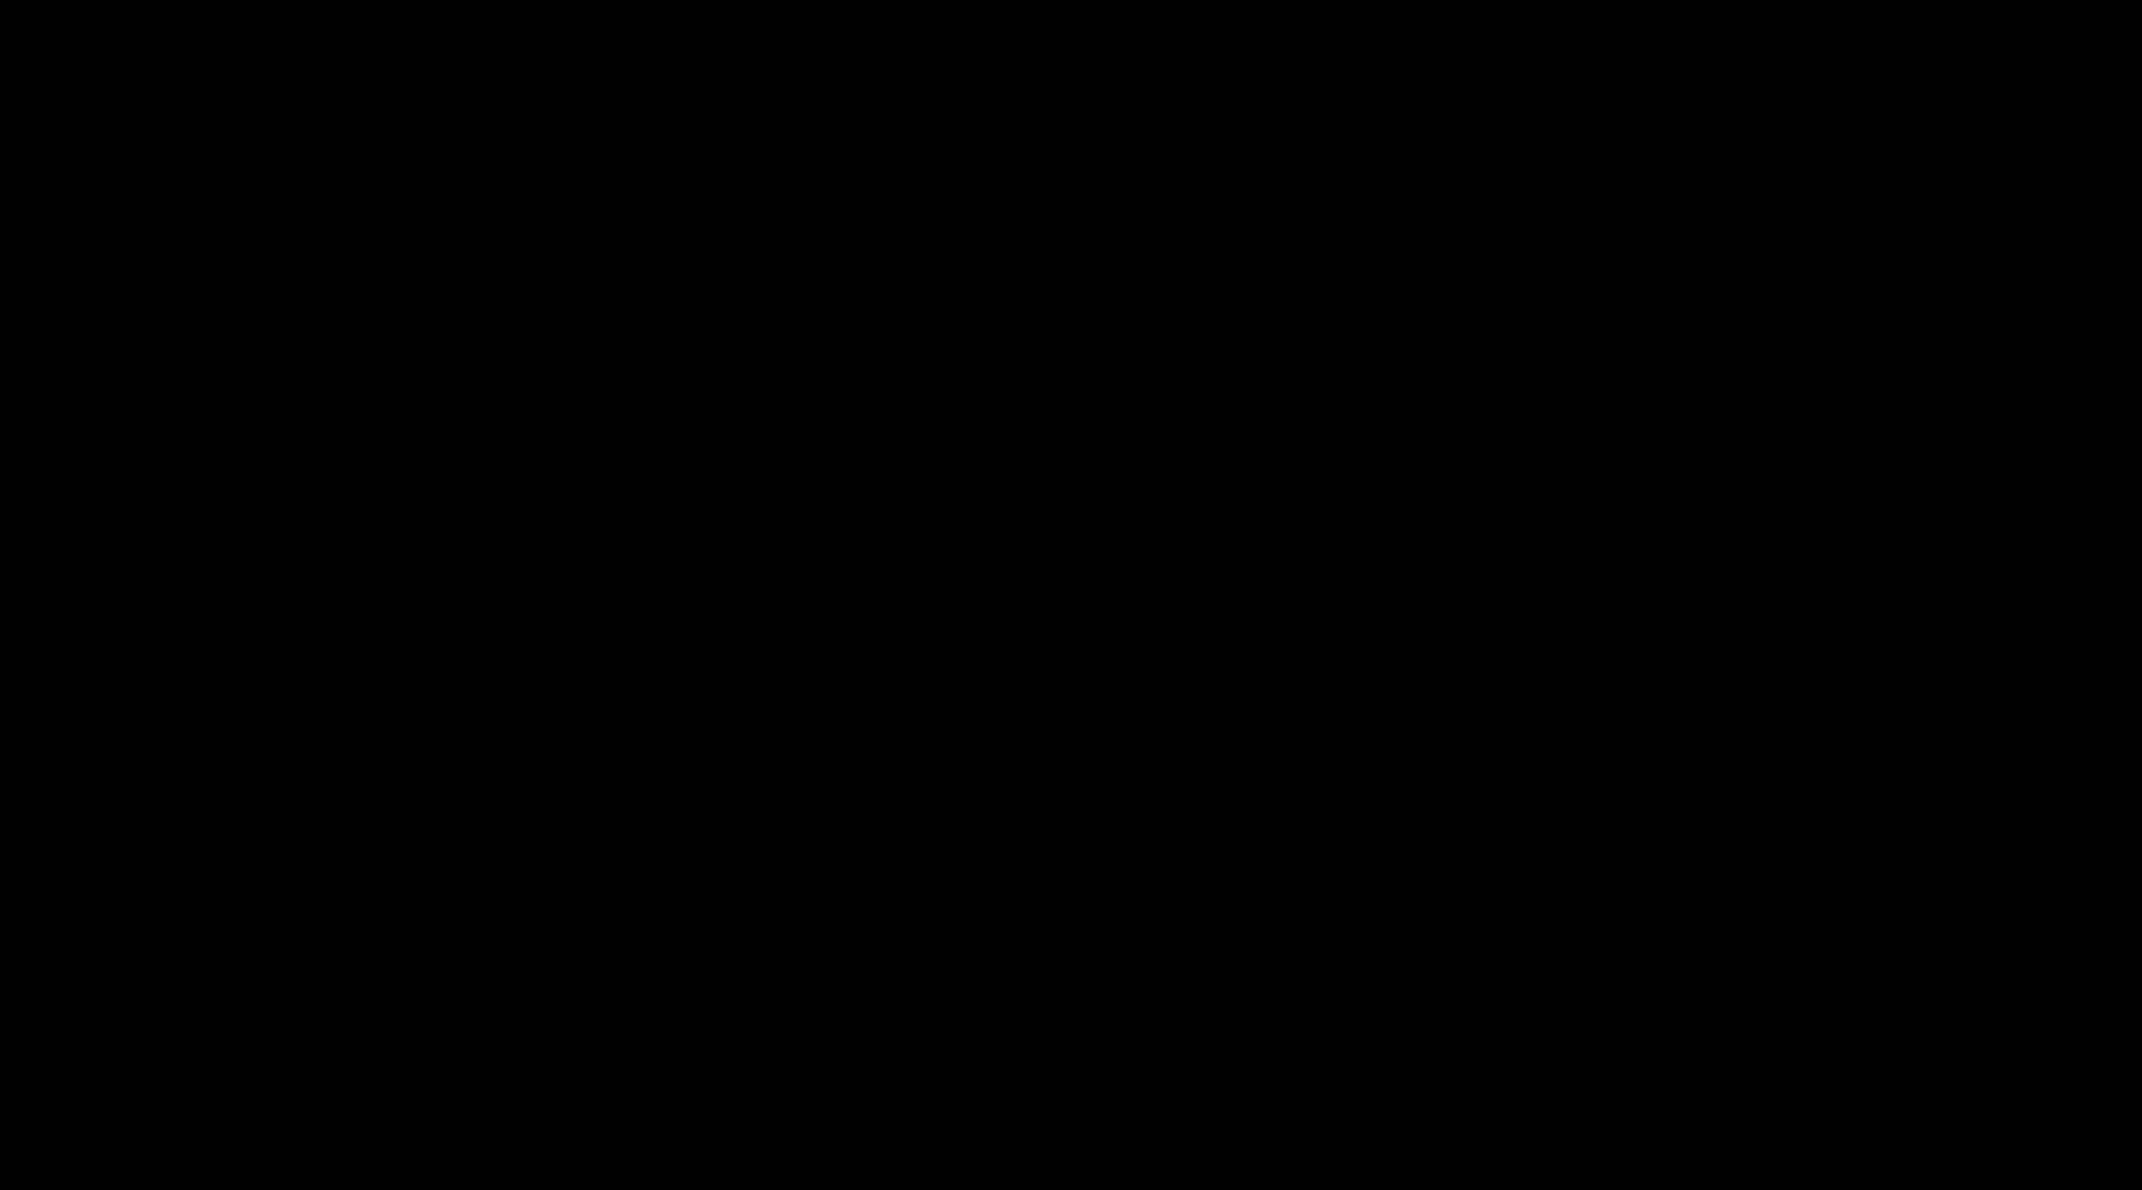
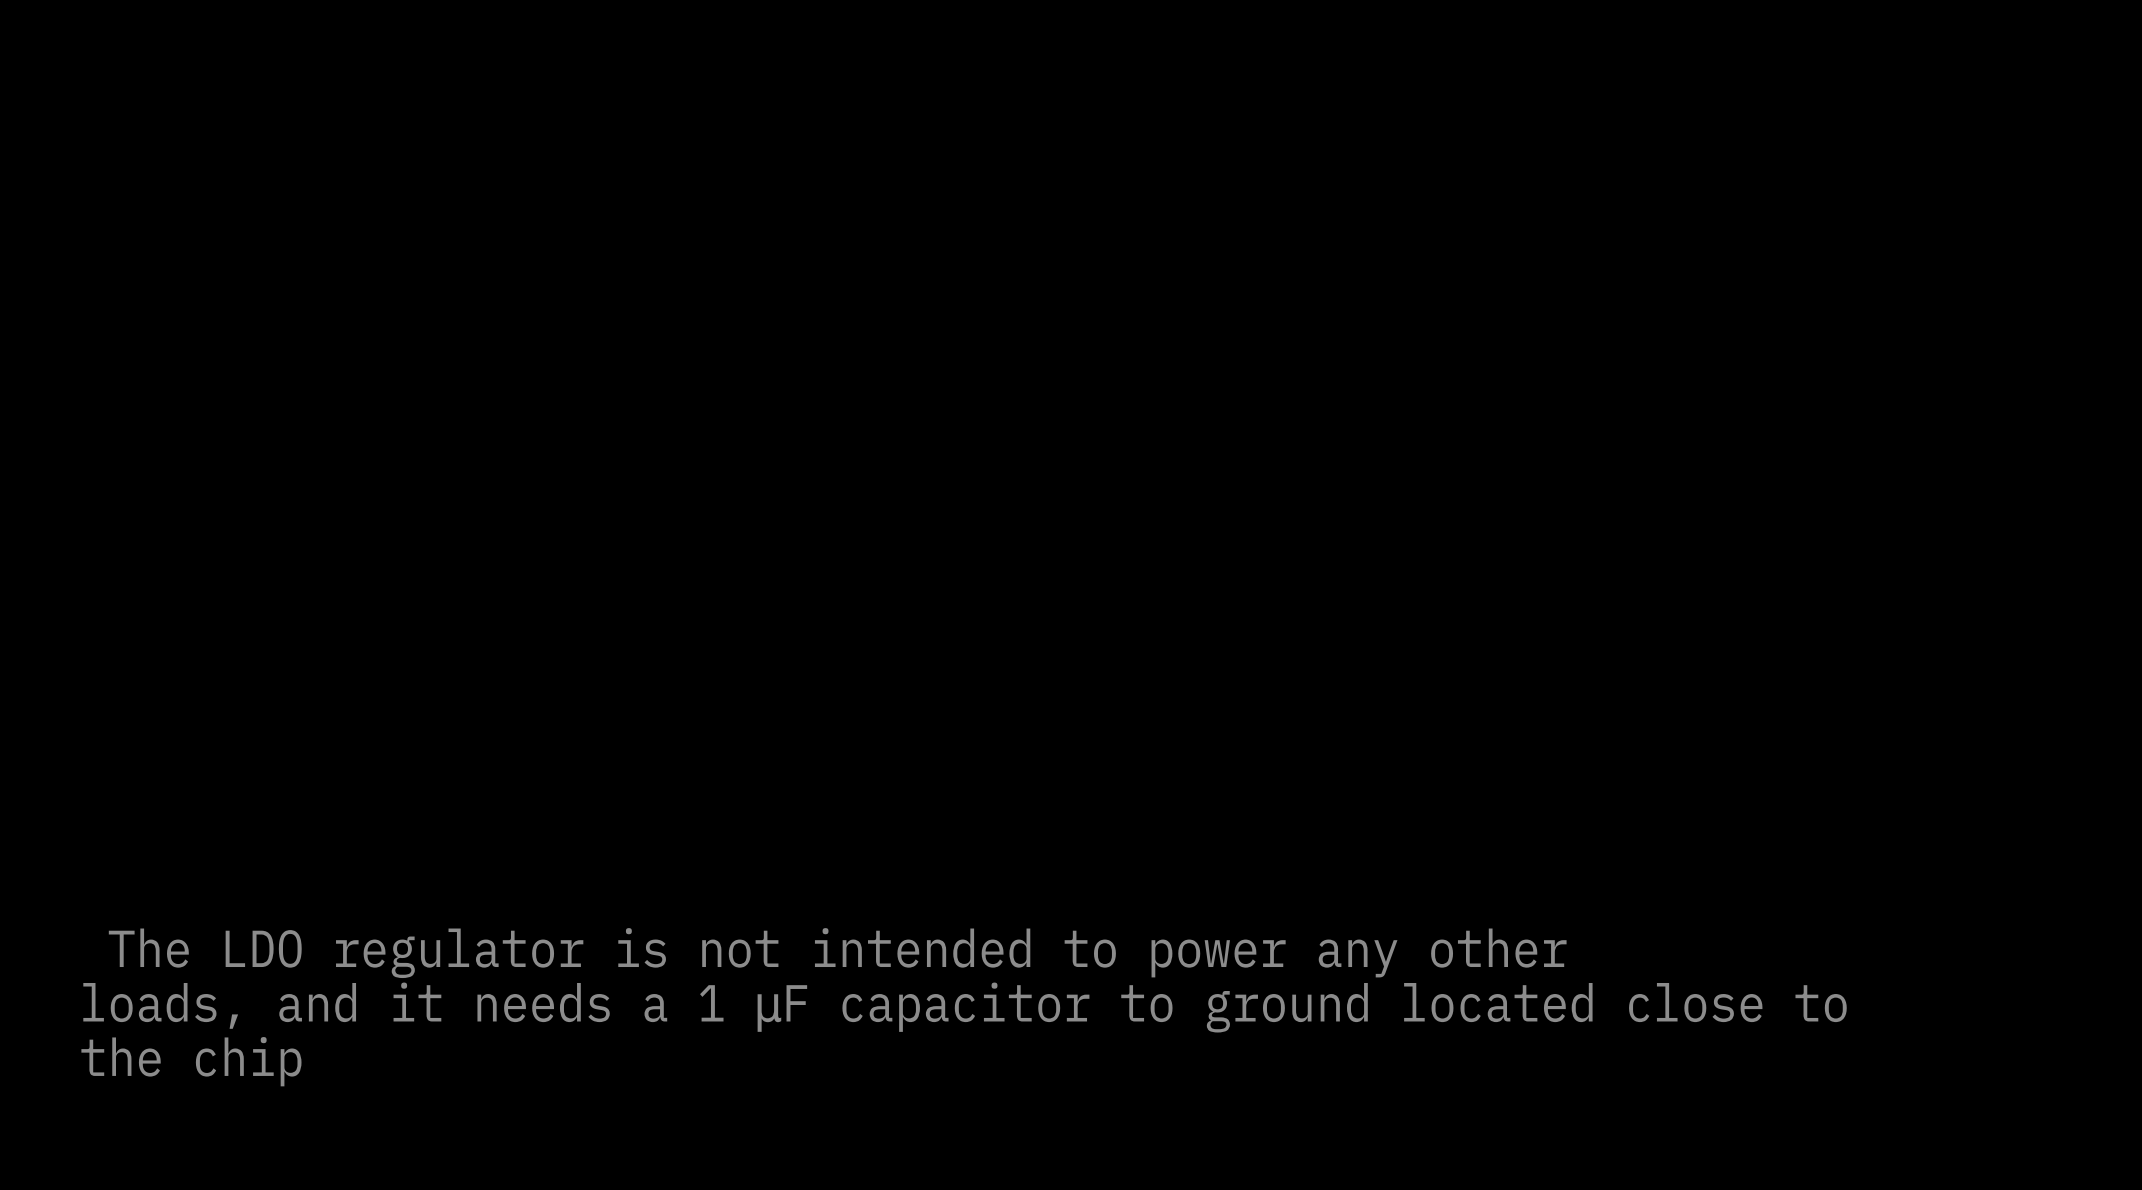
text: none -> The LDO regulator is not intended to power any other (837, 953)
text: none -> loads, and it needs a 1 μF capacitor to ground located close to (965, 1007)
text: none -> the chip (191, 1061)

